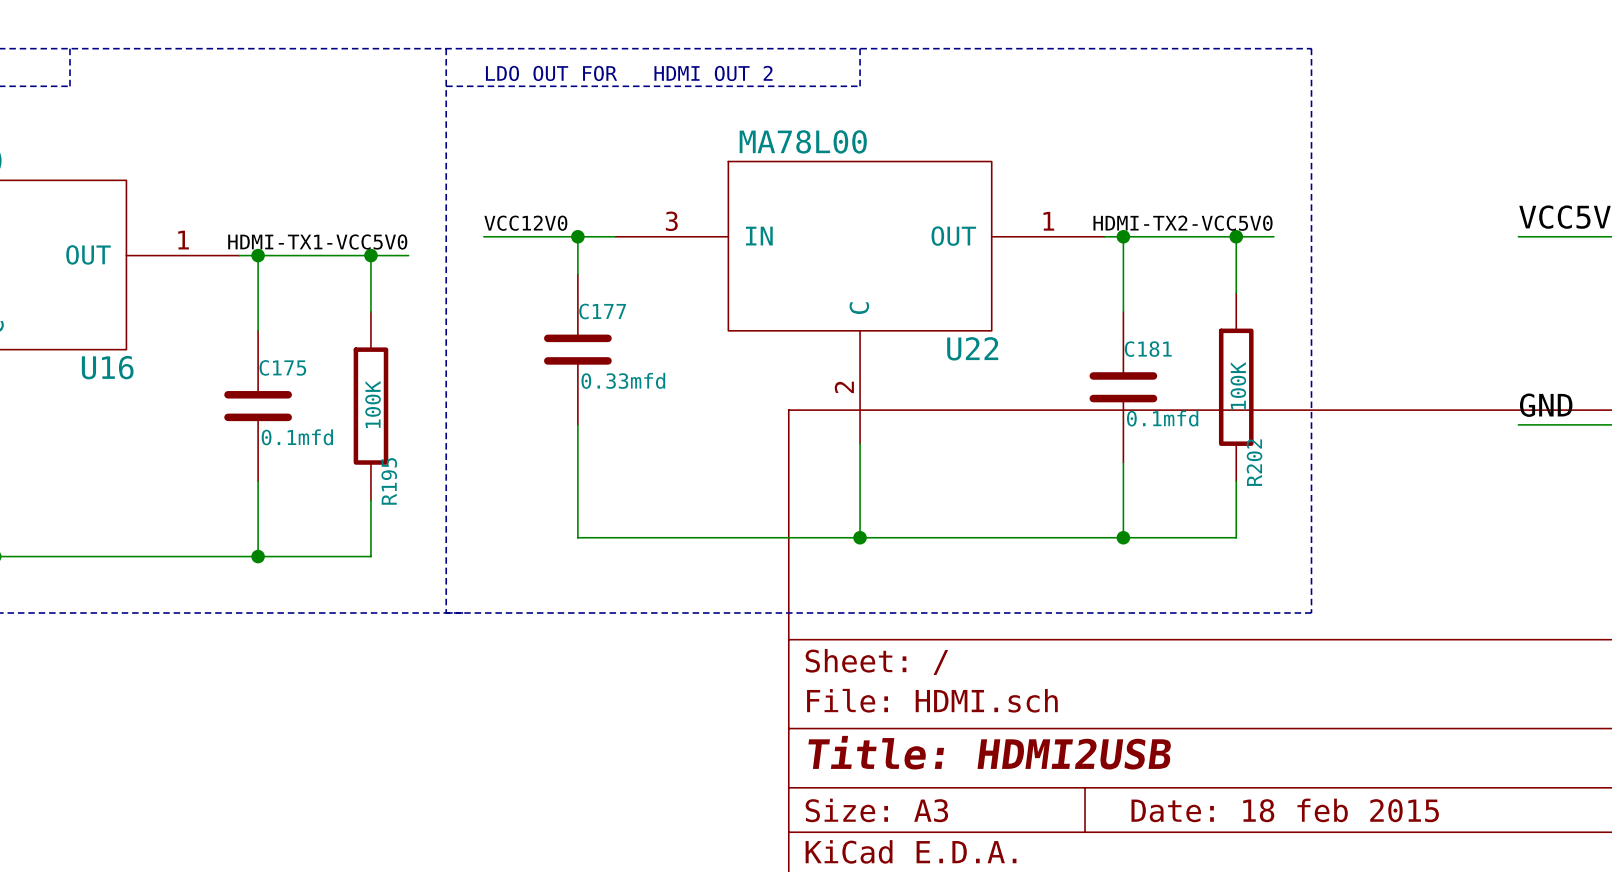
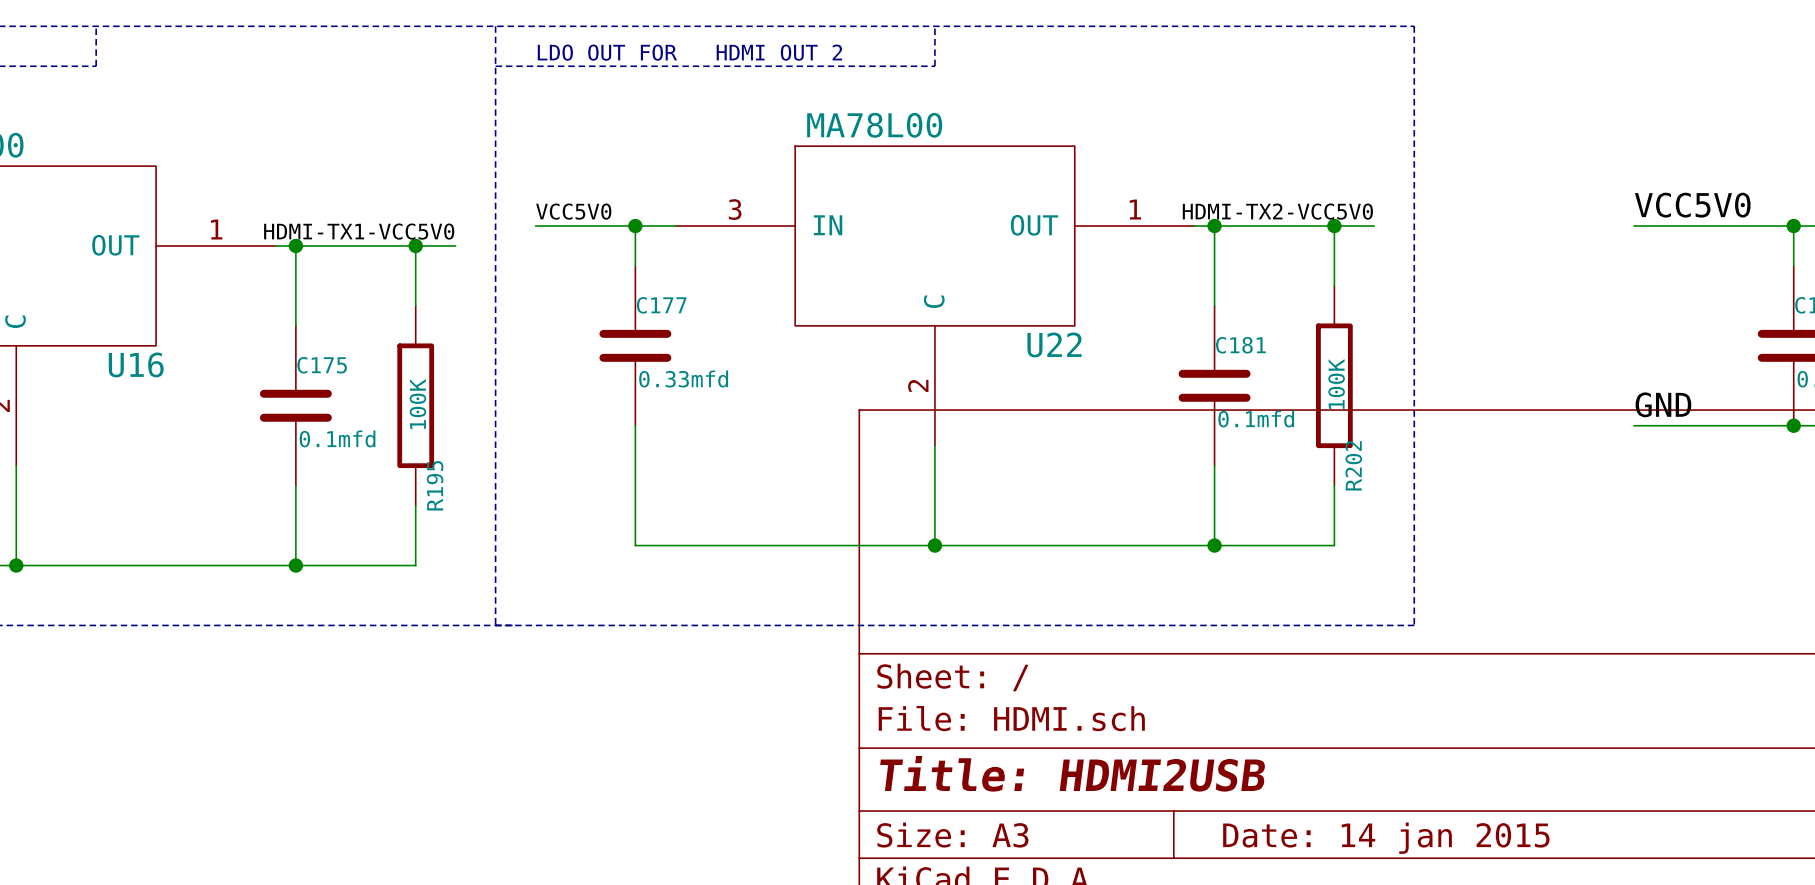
label: VCC12V0 (525, 223) -> VCC5V0 (573, 211)
title block: Date: 18 feb 2015 (1285, 810) -> Date: 14 jan 2015 (1386, 838)

